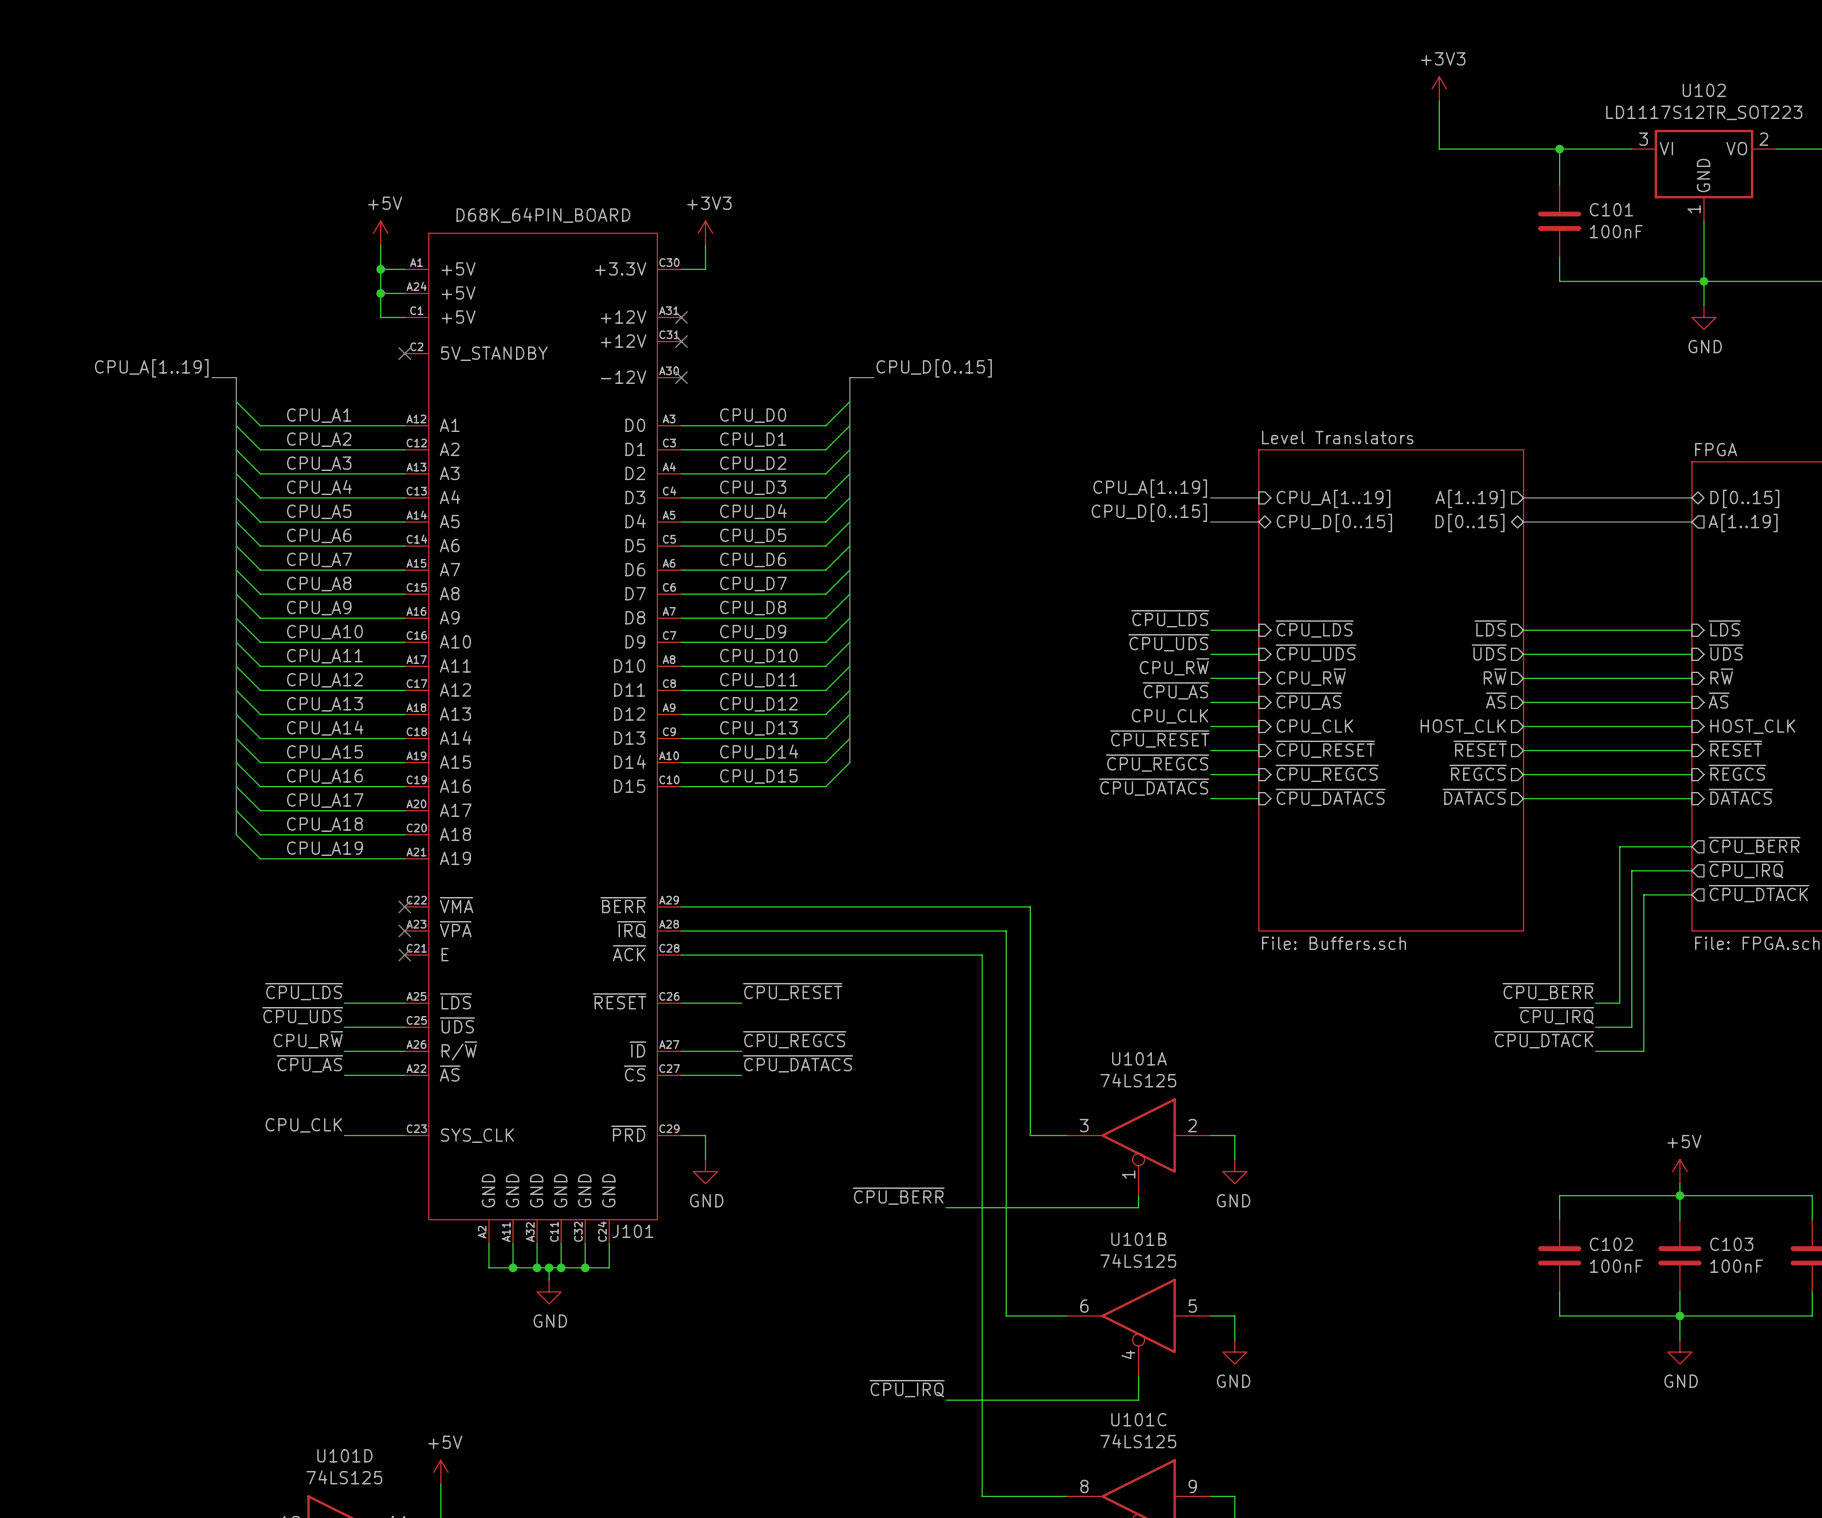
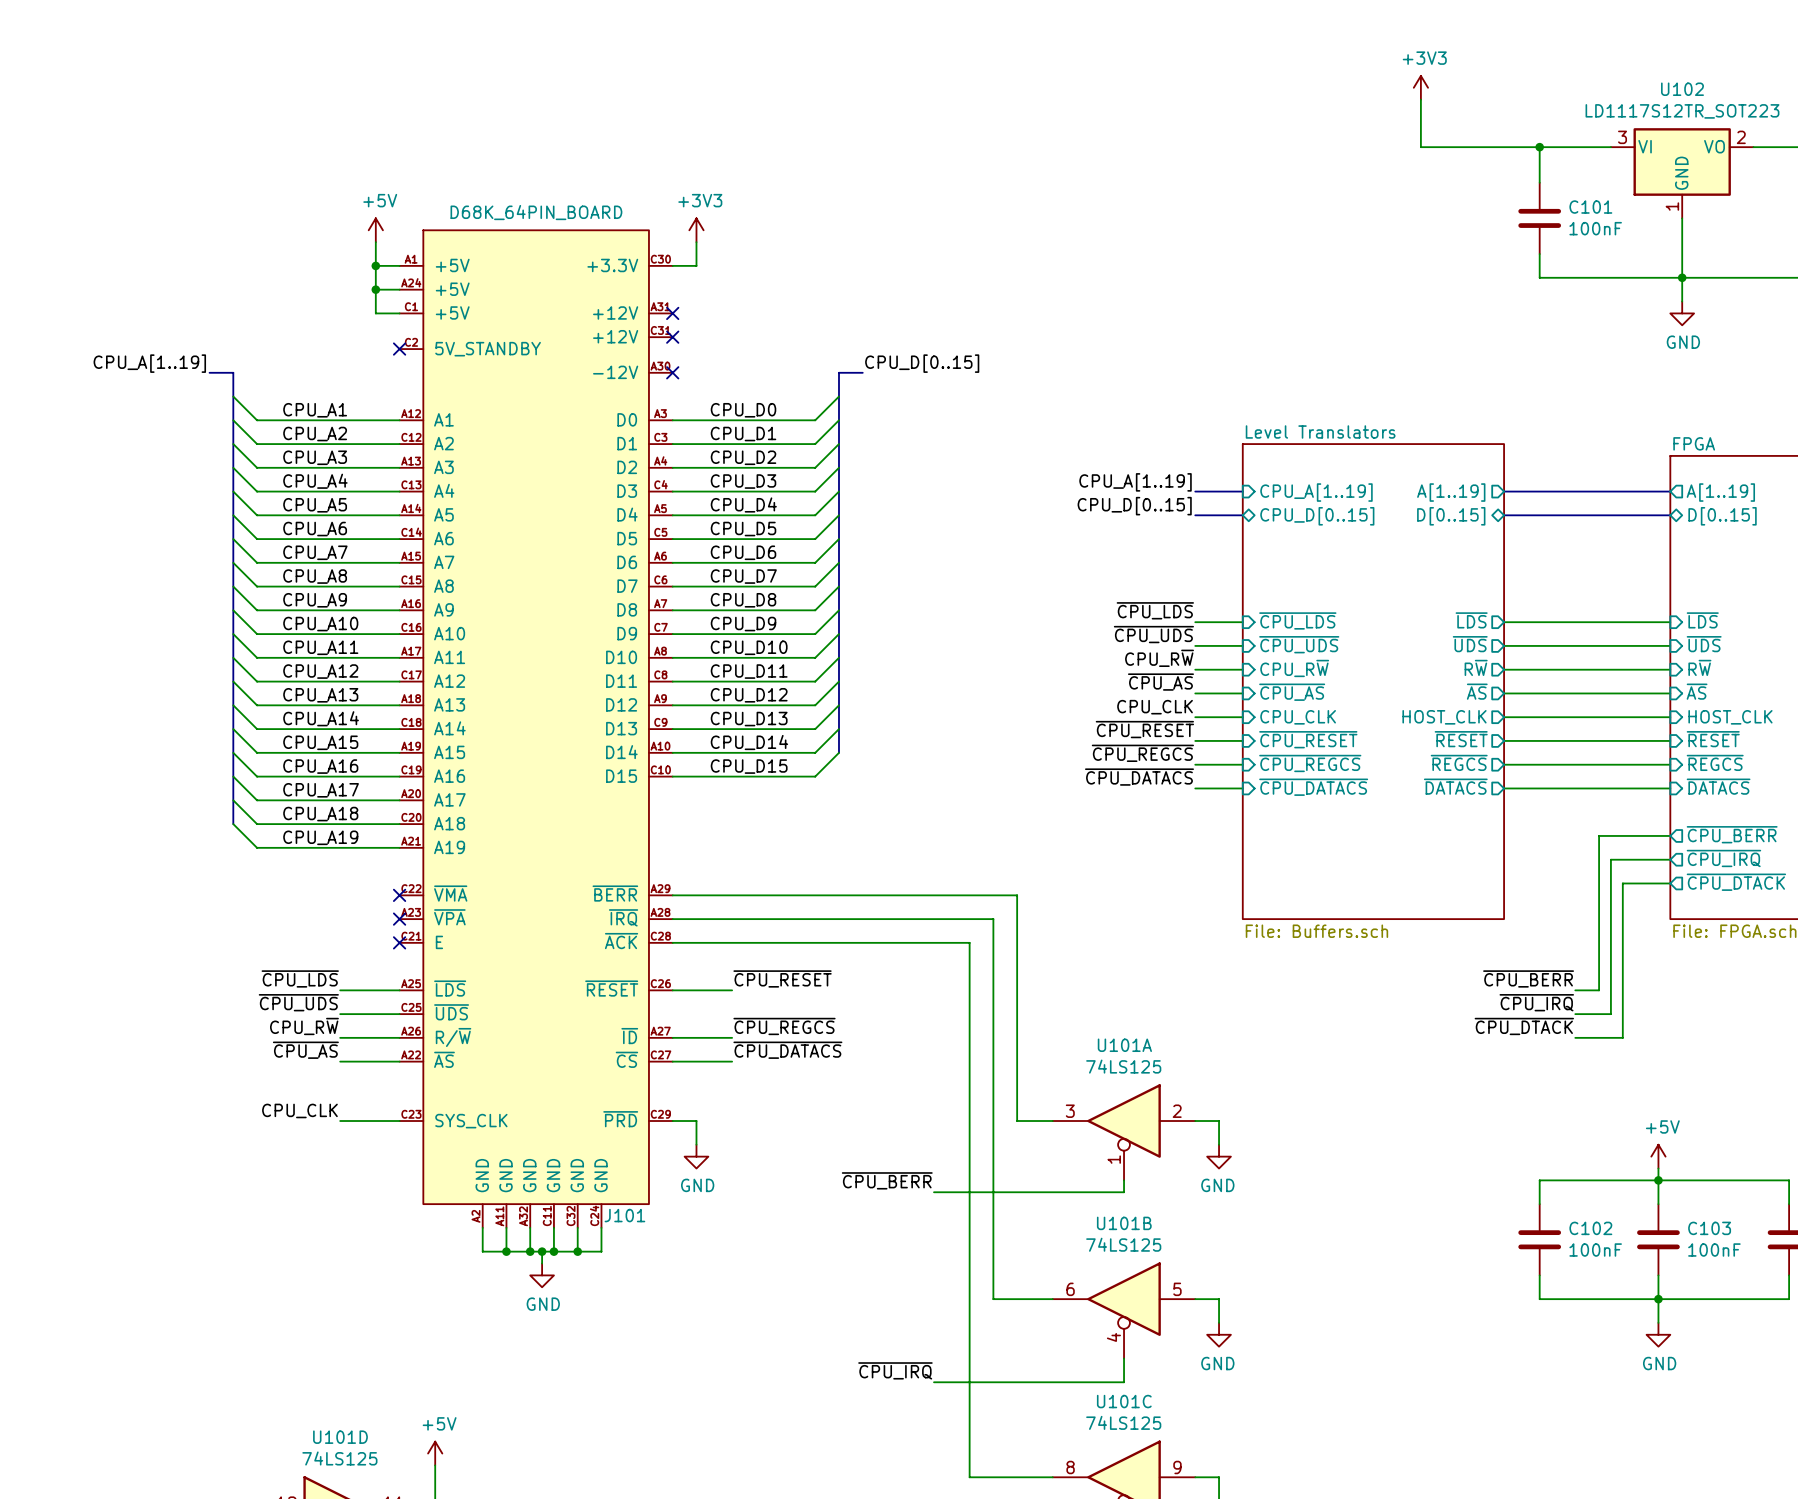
sheet pin shape: bidirectional (1744, 498) -> output (1720, 492)
sheet pin: D[0..15] (1744, 498) -> A[1..19] (1720, 492)
sheet pin shape: output (1743, 522) -> bidirectional (1722, 516)
sheet pin: A[1..19] (1743, 522) -> D[0..15] (1722, 516)

